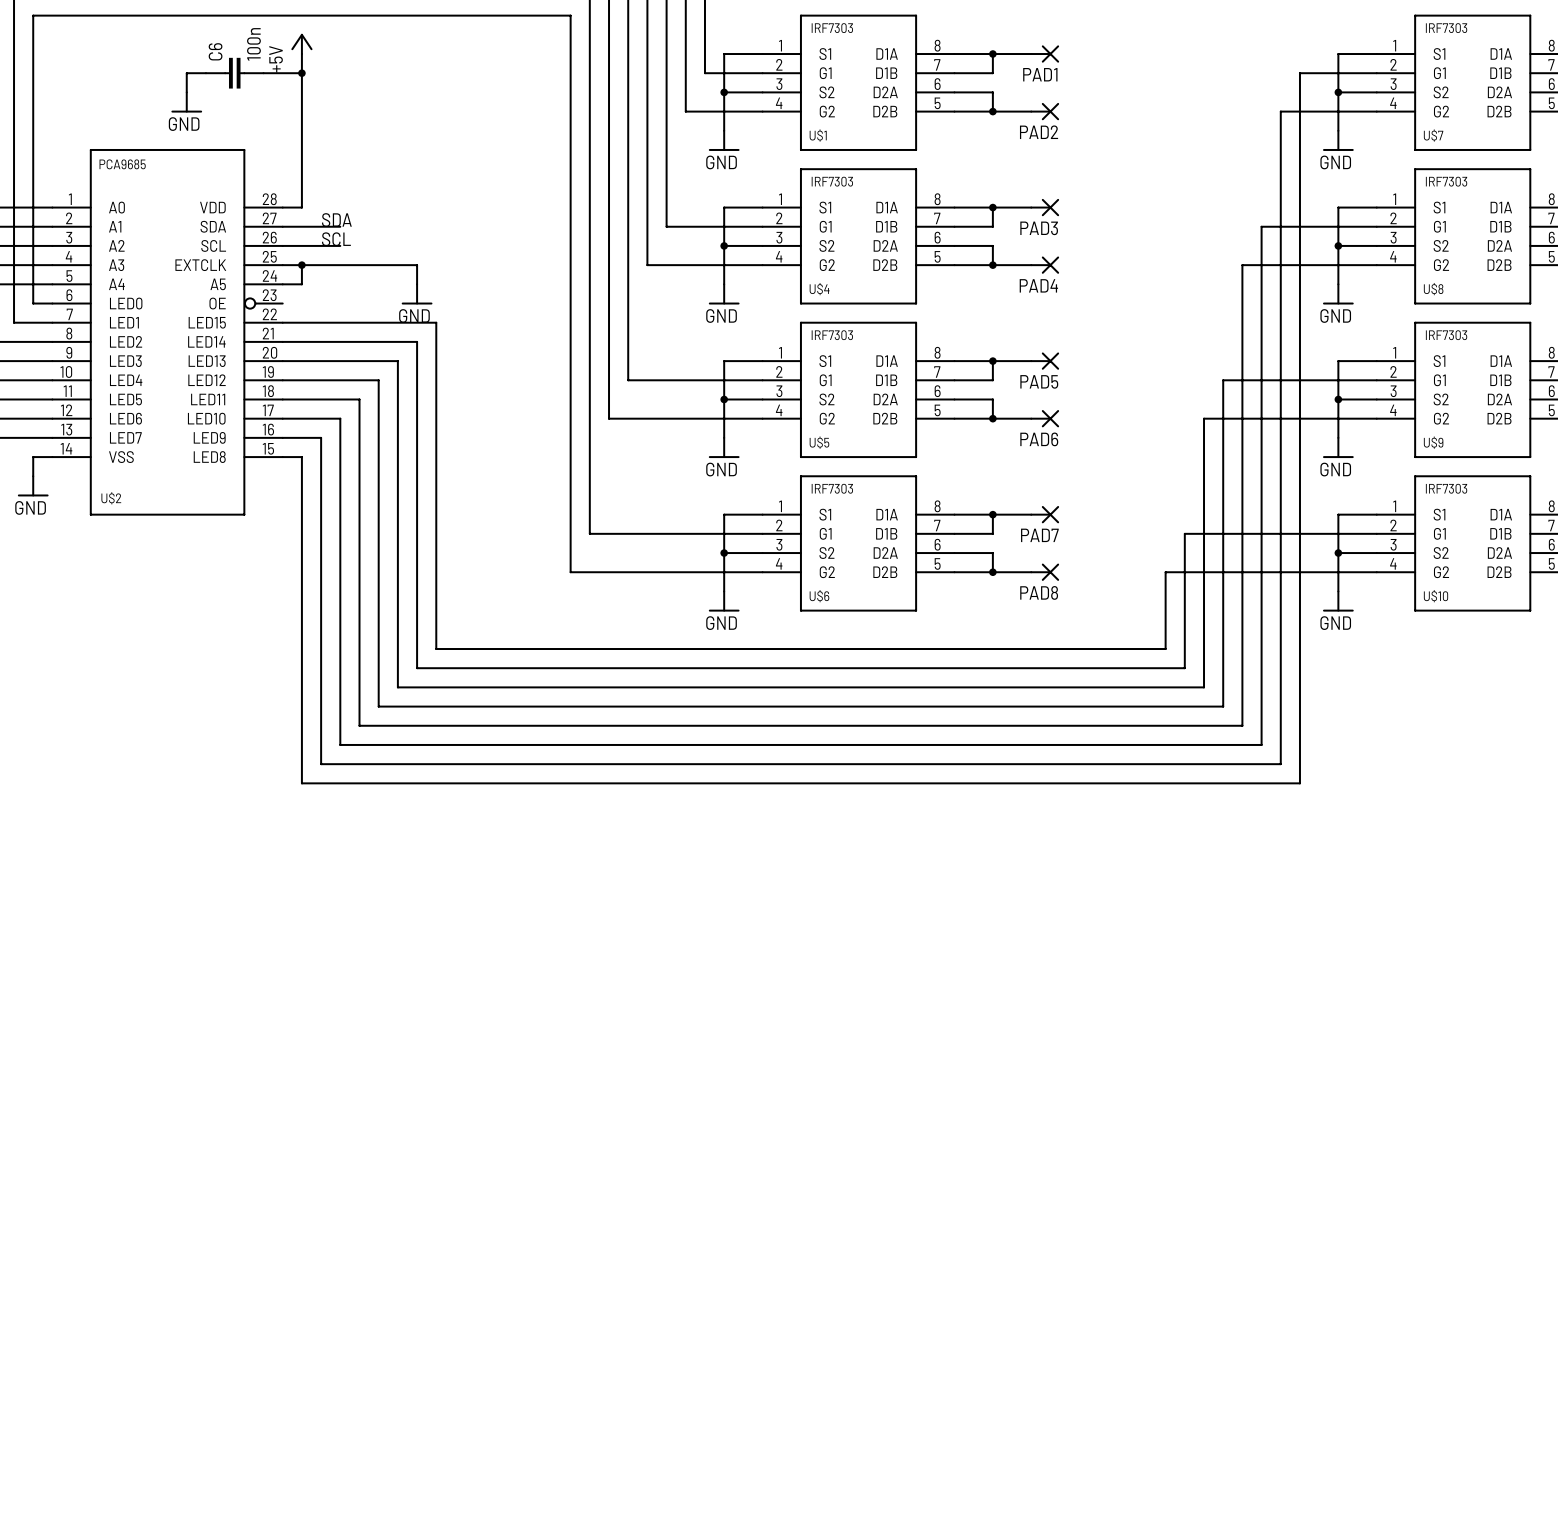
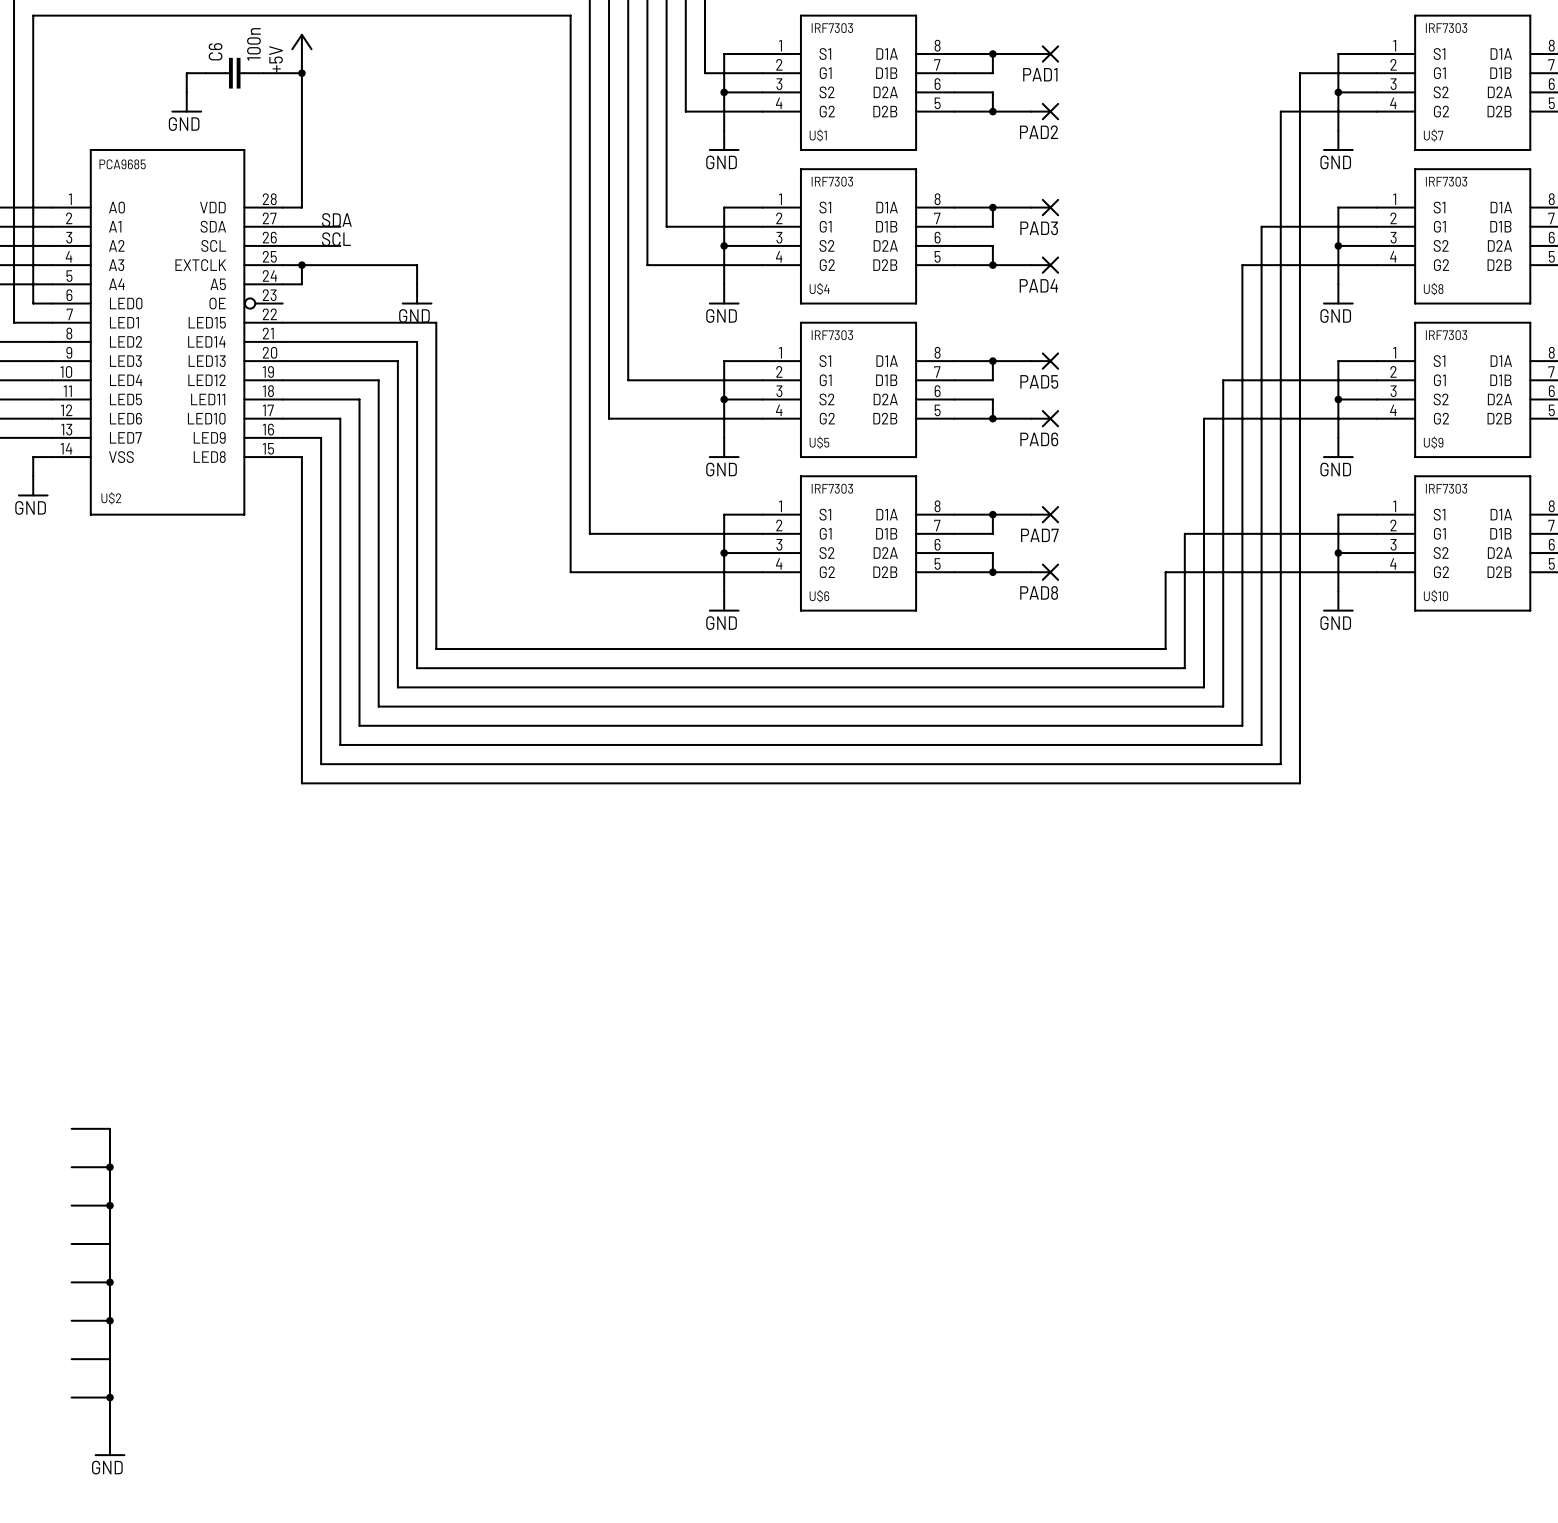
wire: none -> (71, 1128) (109, 1128) (109, 1435)
wire: none -> (71, 1167) (109, 1167)
junction: none -> (109, 1167)
wire: none -> (71, 1205) (109, 1205)
junction: none -> (109, 1205)
wire: none -> (71, 1243) (109, 1243)
wire: none -> (71, 1282) (109, 1282)
junction: none -> (109, 1282)
wire: none -> (71, 1320) (109, 1320)
junction: none -> (109, 1320)
wire: none -> (71, 1359) (109, 1359)
wire: none -> (71, 1397) (109, 1397)
junction: none -> (109, 1397)
power symbol: none -> GND (109, 1446)

